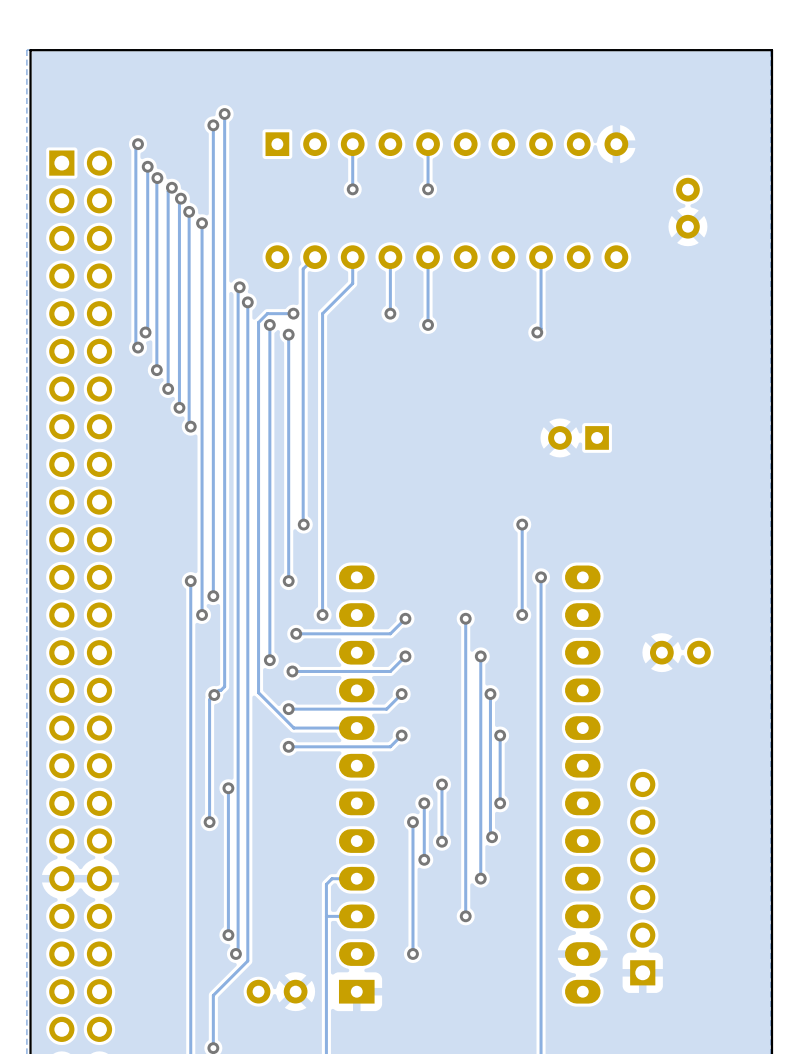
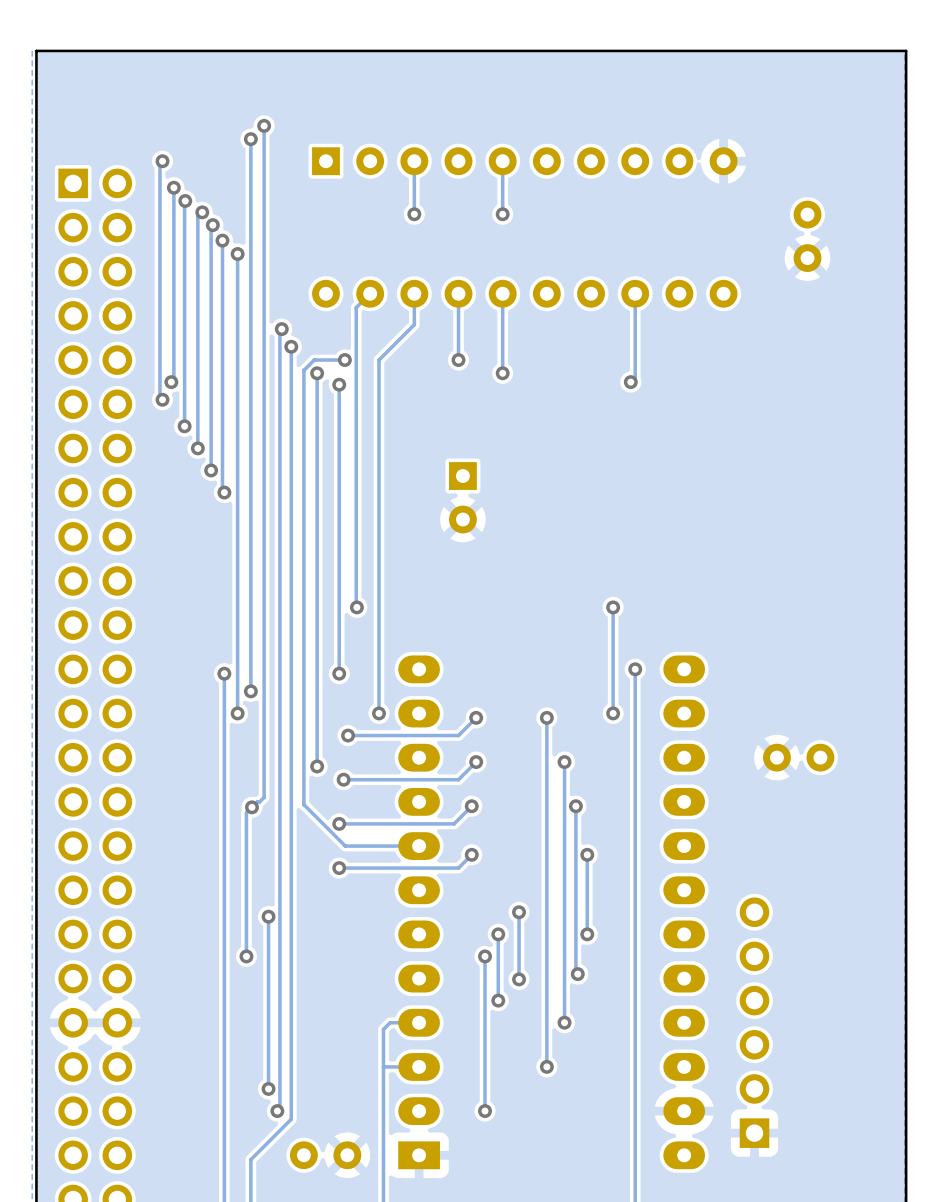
part rotation: 0° (578, 437) -> 90° counterclockwise (462, 497)
part position: (578, 437) -> (462, 497)

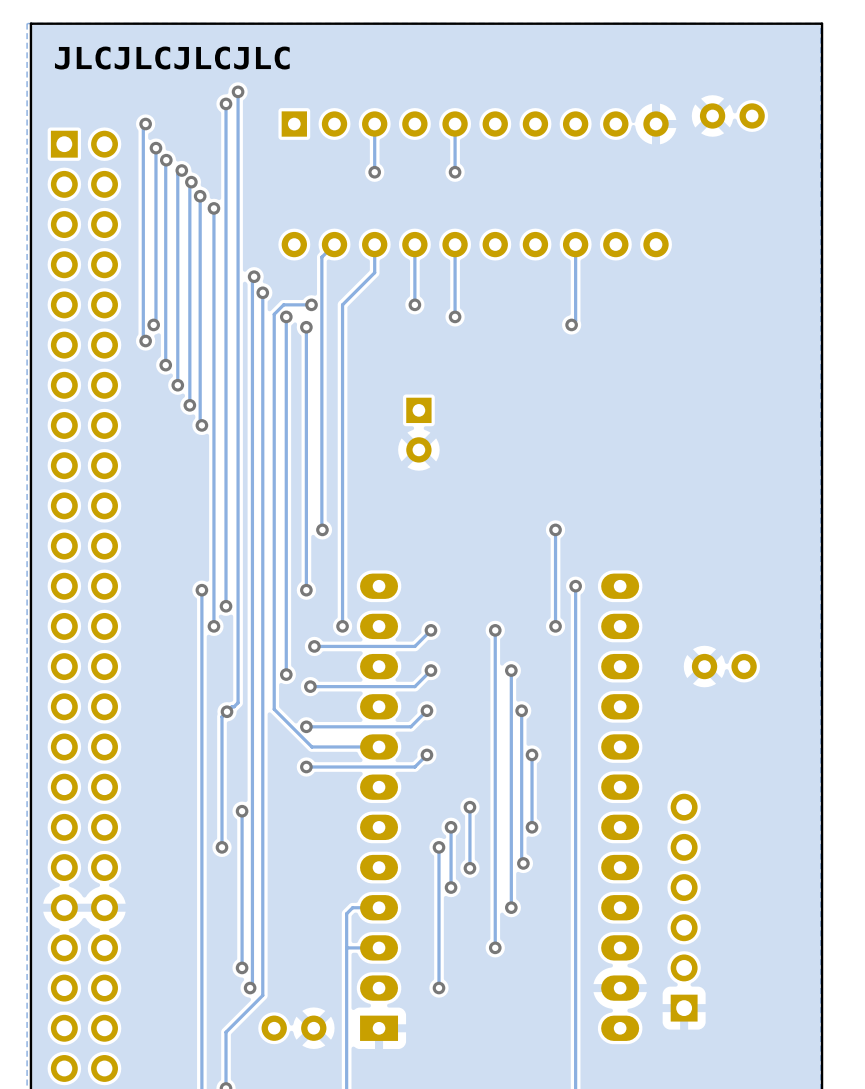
text: none -> JLCJLCJLCJLC (172, 58)
part rotation: 0° (807, 236) -> 90° clockwise (732, 115)
part position: (807, 236) -> (732, 115)

